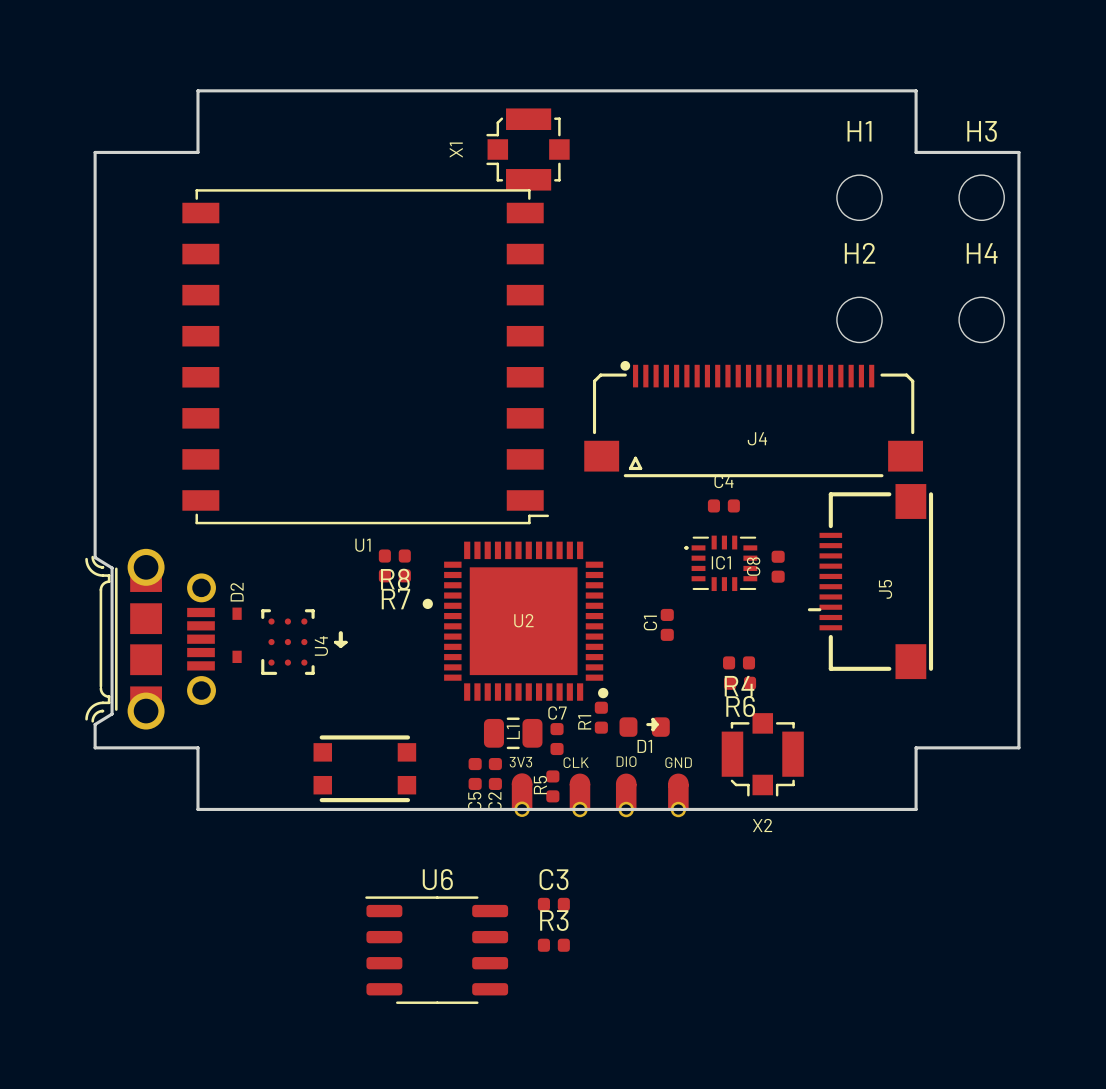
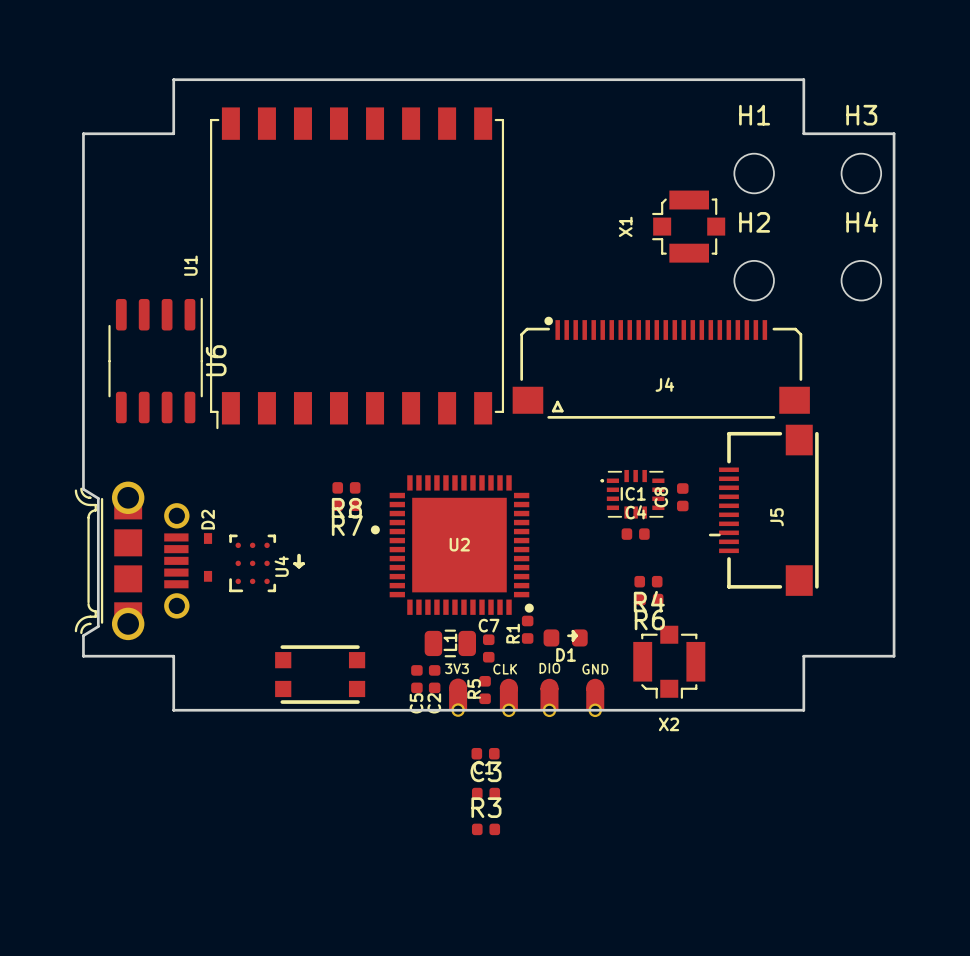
X1 position: (527, 149) -> (688, 226)
U1 rotation: 0° (365, 356) -> 90° clockwise (357, 268)
C4 position: (723, 505) -> (635, 534)
C1 rotation: 0° (667, 624) -> 90° clockwise (485, 753)
C1 position: (667, 624) -> (485, 753)
U6 rotation: 0° (436, 950) -> 90° clockwise (155, 360)
U6 position: (436, 950) -> (155, 360)

